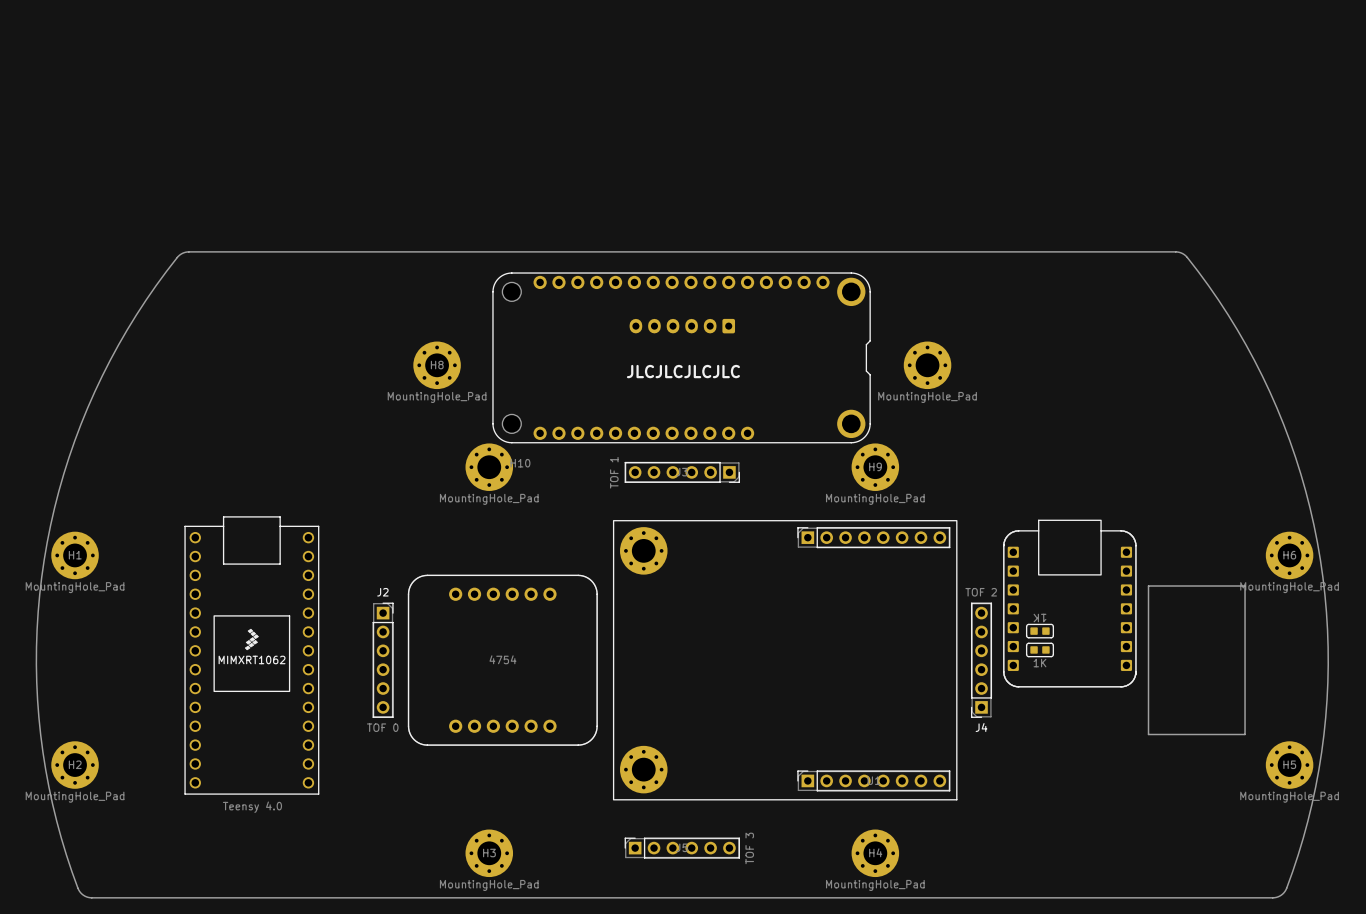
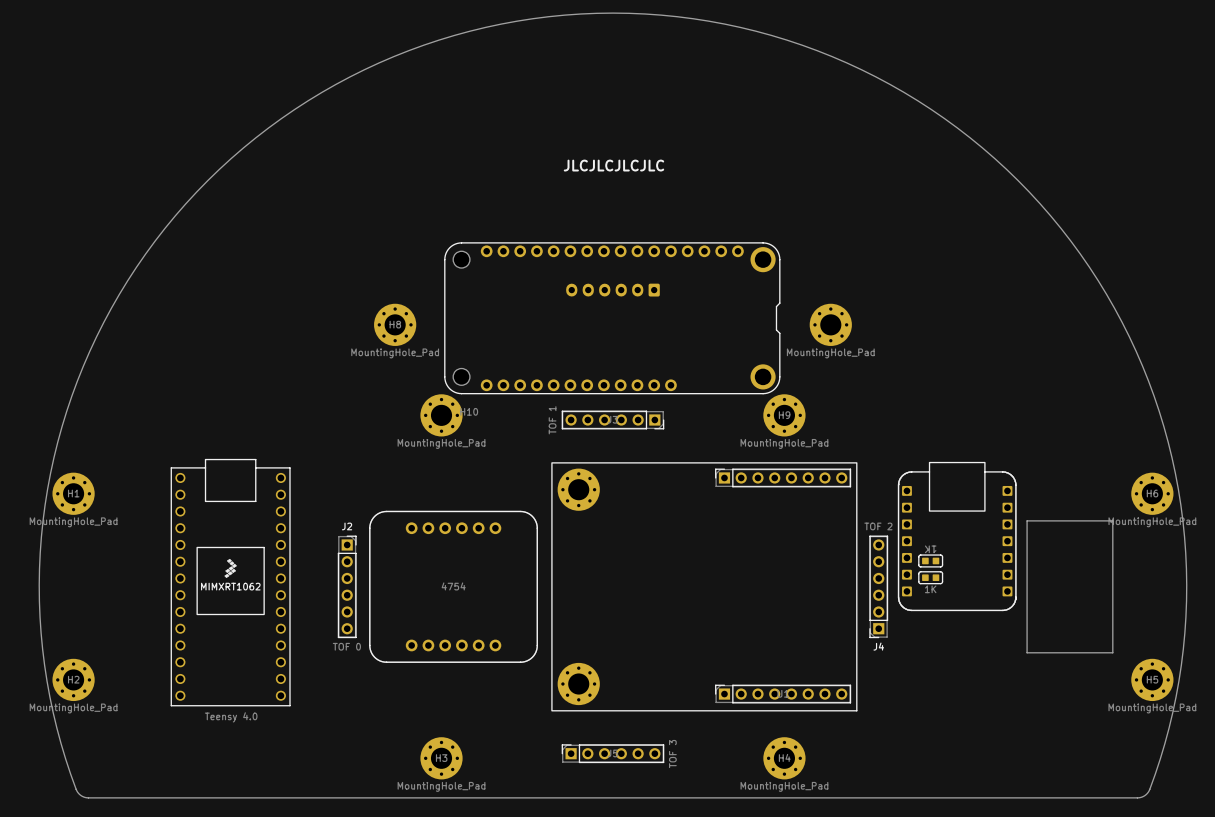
text position: JLCJLCJLCJLC (683, 371) -> JLCJLCJLCJLC (613, 165)
board edge: (77, 888) (52, 804) (38, 717) (37, 629) (47, 542) (69, 457) (102, 376) (127, 329) (156, 285) (178, 256) (188, 251) (1175, 251) (1183, 254) (1228, 314) (1269, 391) (1300, 474) (1320, 559) (1327, 629) (1325, 717) (1312, 804) (1286, 888) -> (76, 789) (56, 728) (44, 665) (39, 601) (43, 520) (53, 457) (71, 395) (103, 322) (136, 267) (175, 215) (231, 158) (294, 109) (350, 76) (408, 50) (485, 27) (548, 16) (612, 13) (693, 18) (756, 31) (817, 50) (875, 76) (931, 109) (994, 158) (1040, 203) (1089, 267) (1129, 336) (1154, 395) (1171, 457) (1182, 520) (1186, 601) (1181, 665) (1169, 728) (1149, 789)

